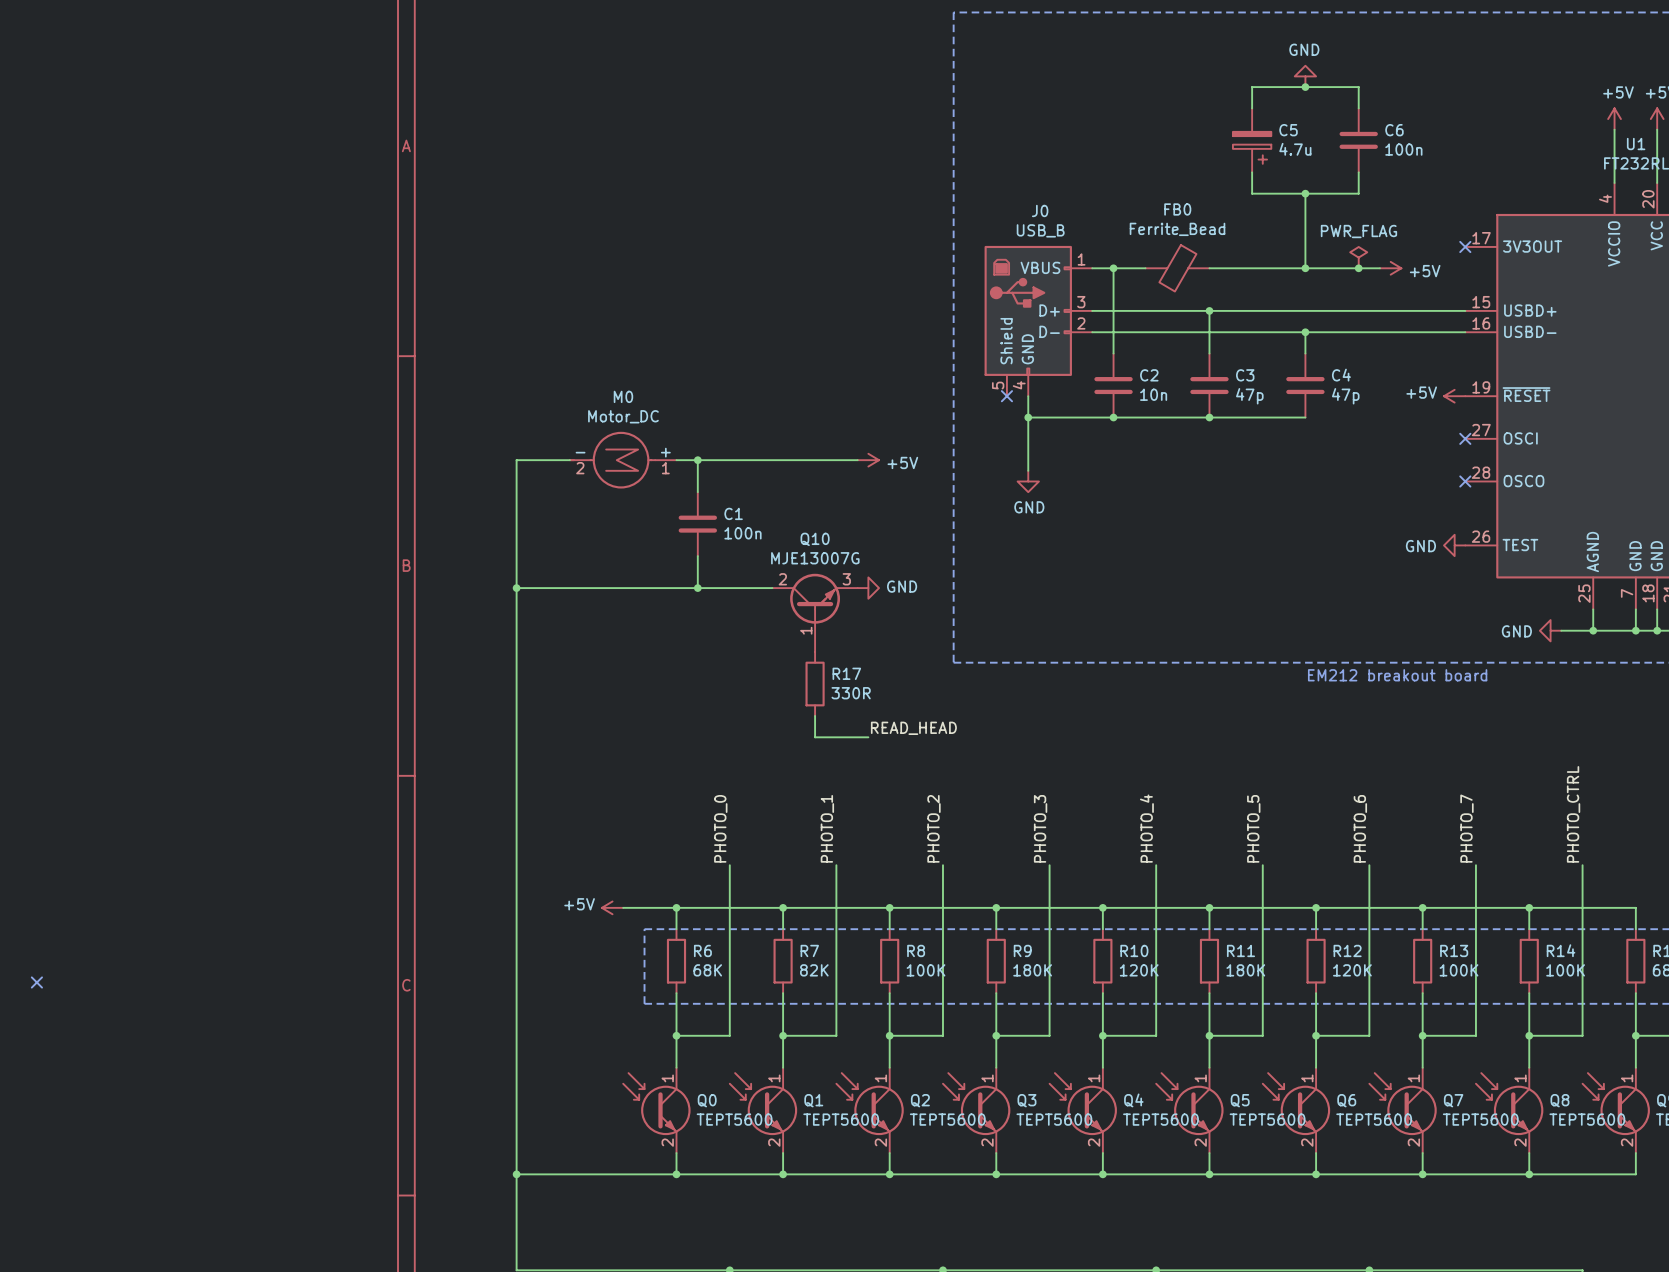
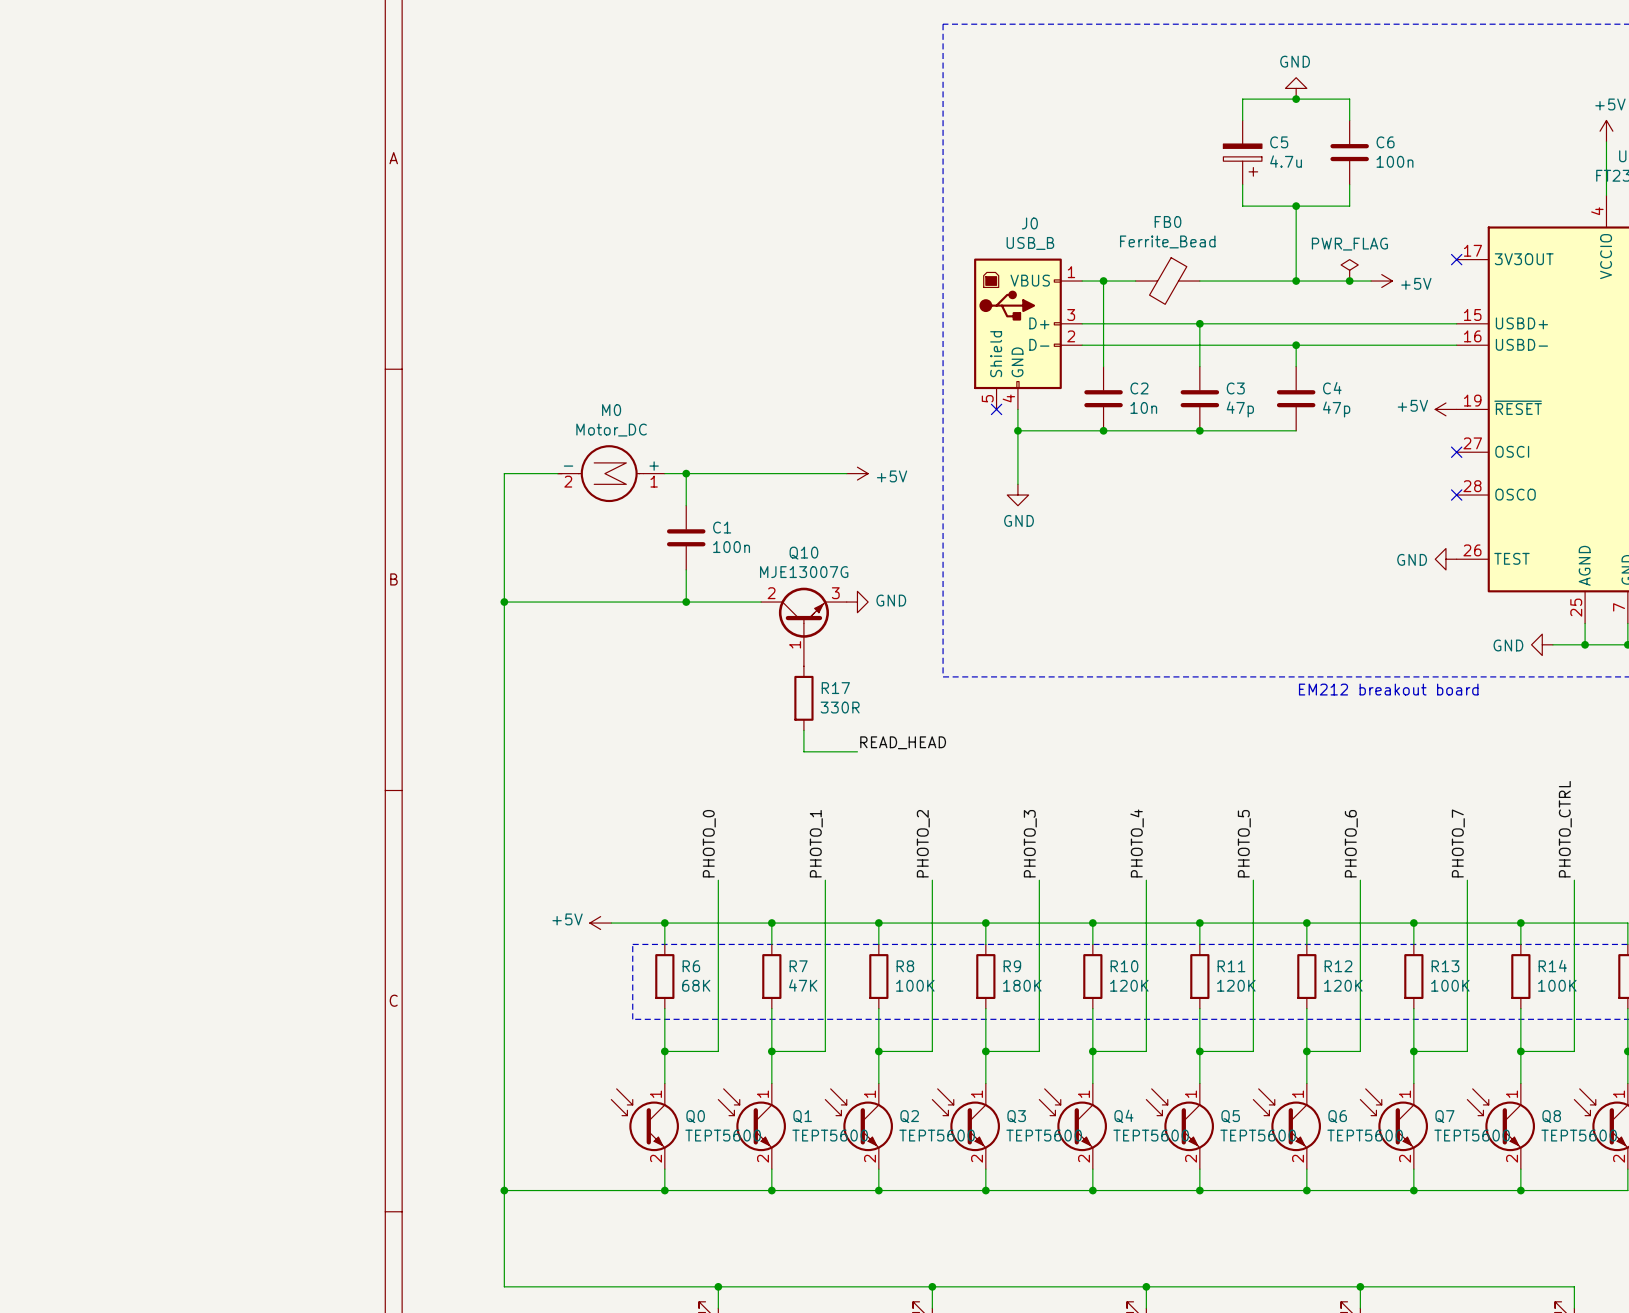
R7 value: 82K (814, 970) -> 47K (803, 985)
R11 value: 180K (1245, 970) -> 120K (1236, 985)
no-connect mark: (36, 982) -> none

